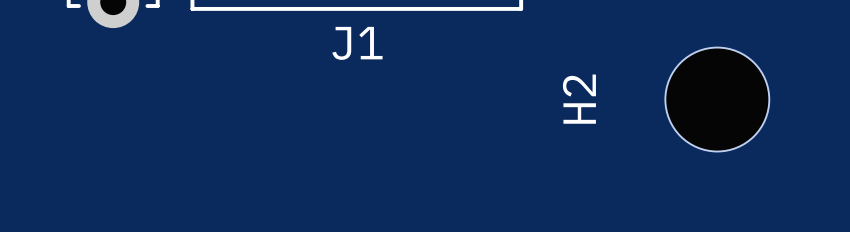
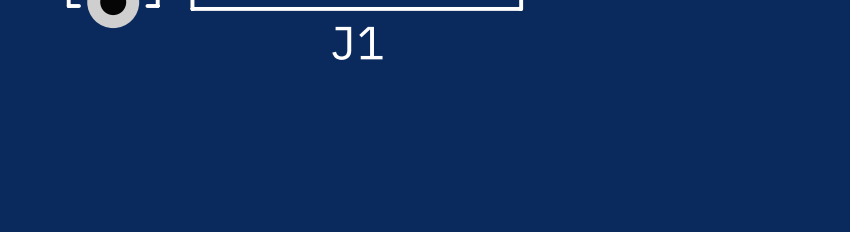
H2: (717, 99) -> none

